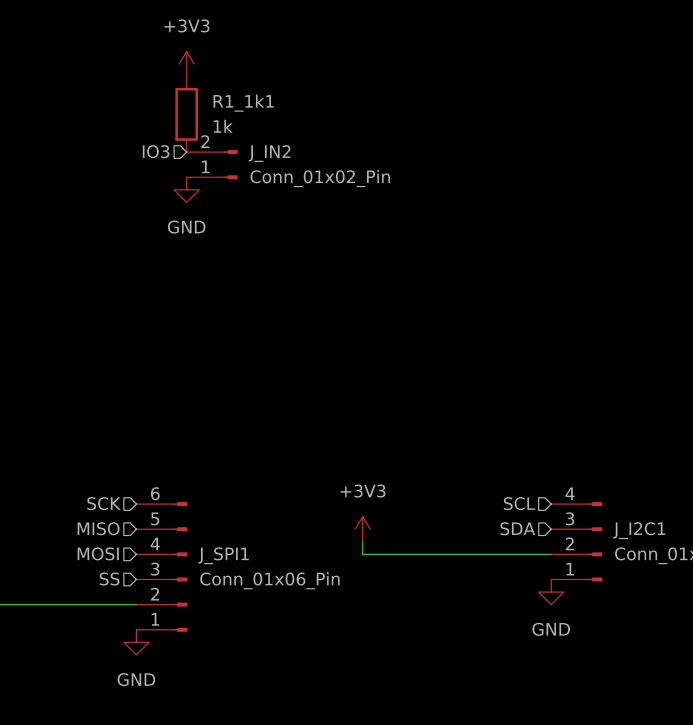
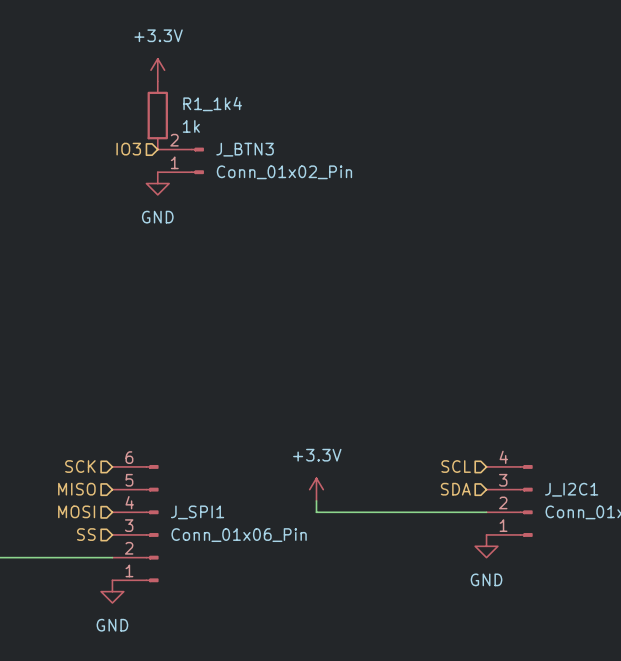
power symbol: +3V3 (186, 64) -> +3.3V (157, 70)
R1_1k1 name: R1_1k1 (243, 103) -> R1_1k4 (212, 104)
J_IN2 name: J_IN2 (269, 153) -> J_BTN3 (245, 149)
power symbol: +3V3 (362, 529) -> +3.3V (316, 489)

